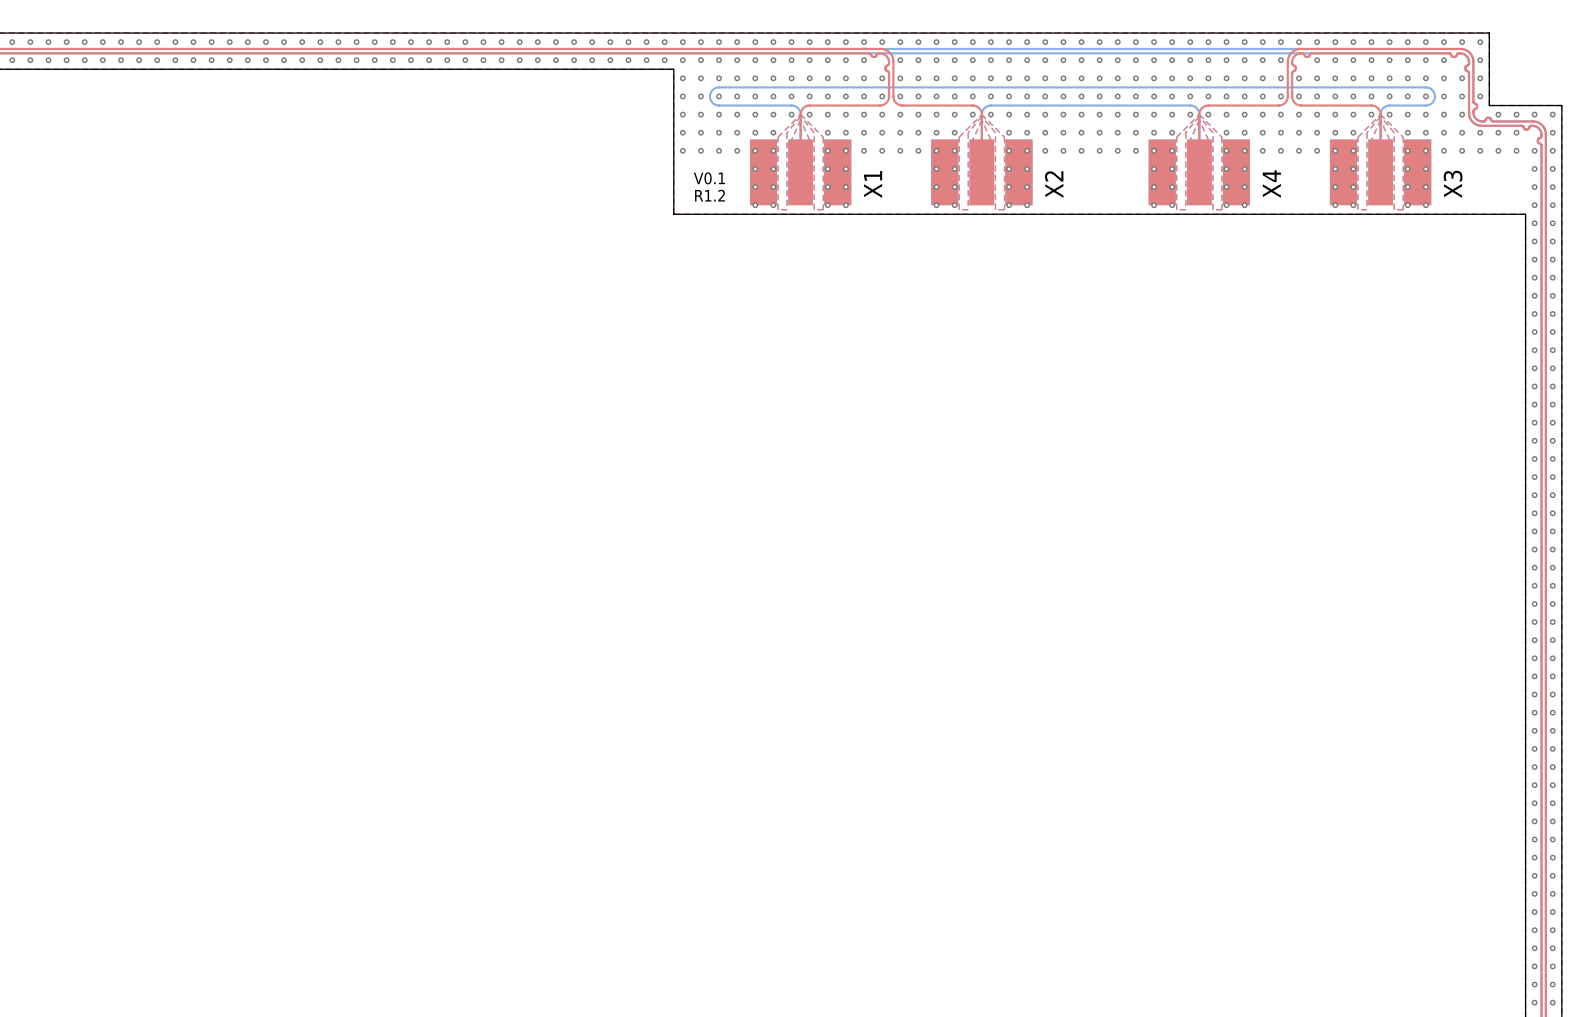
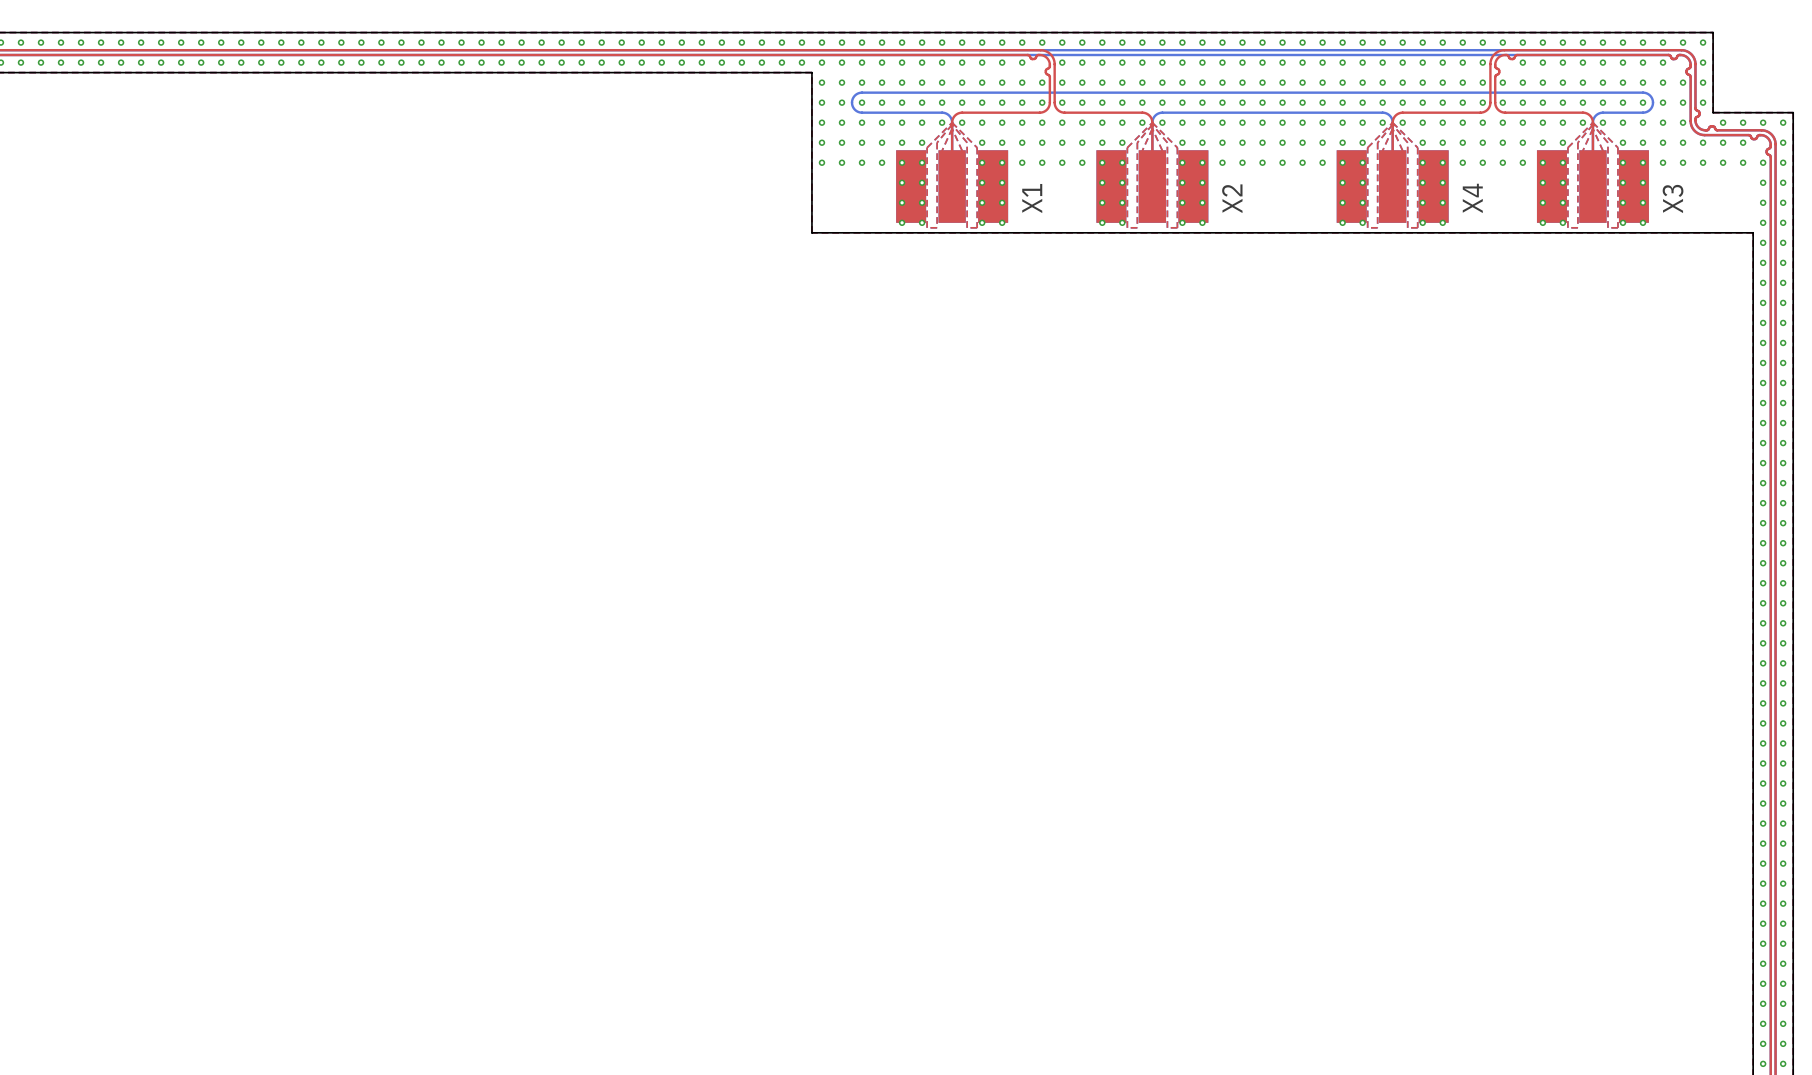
text: V0.1 (709, 178) -> none
text: R1.2 (709, 195) -> none

